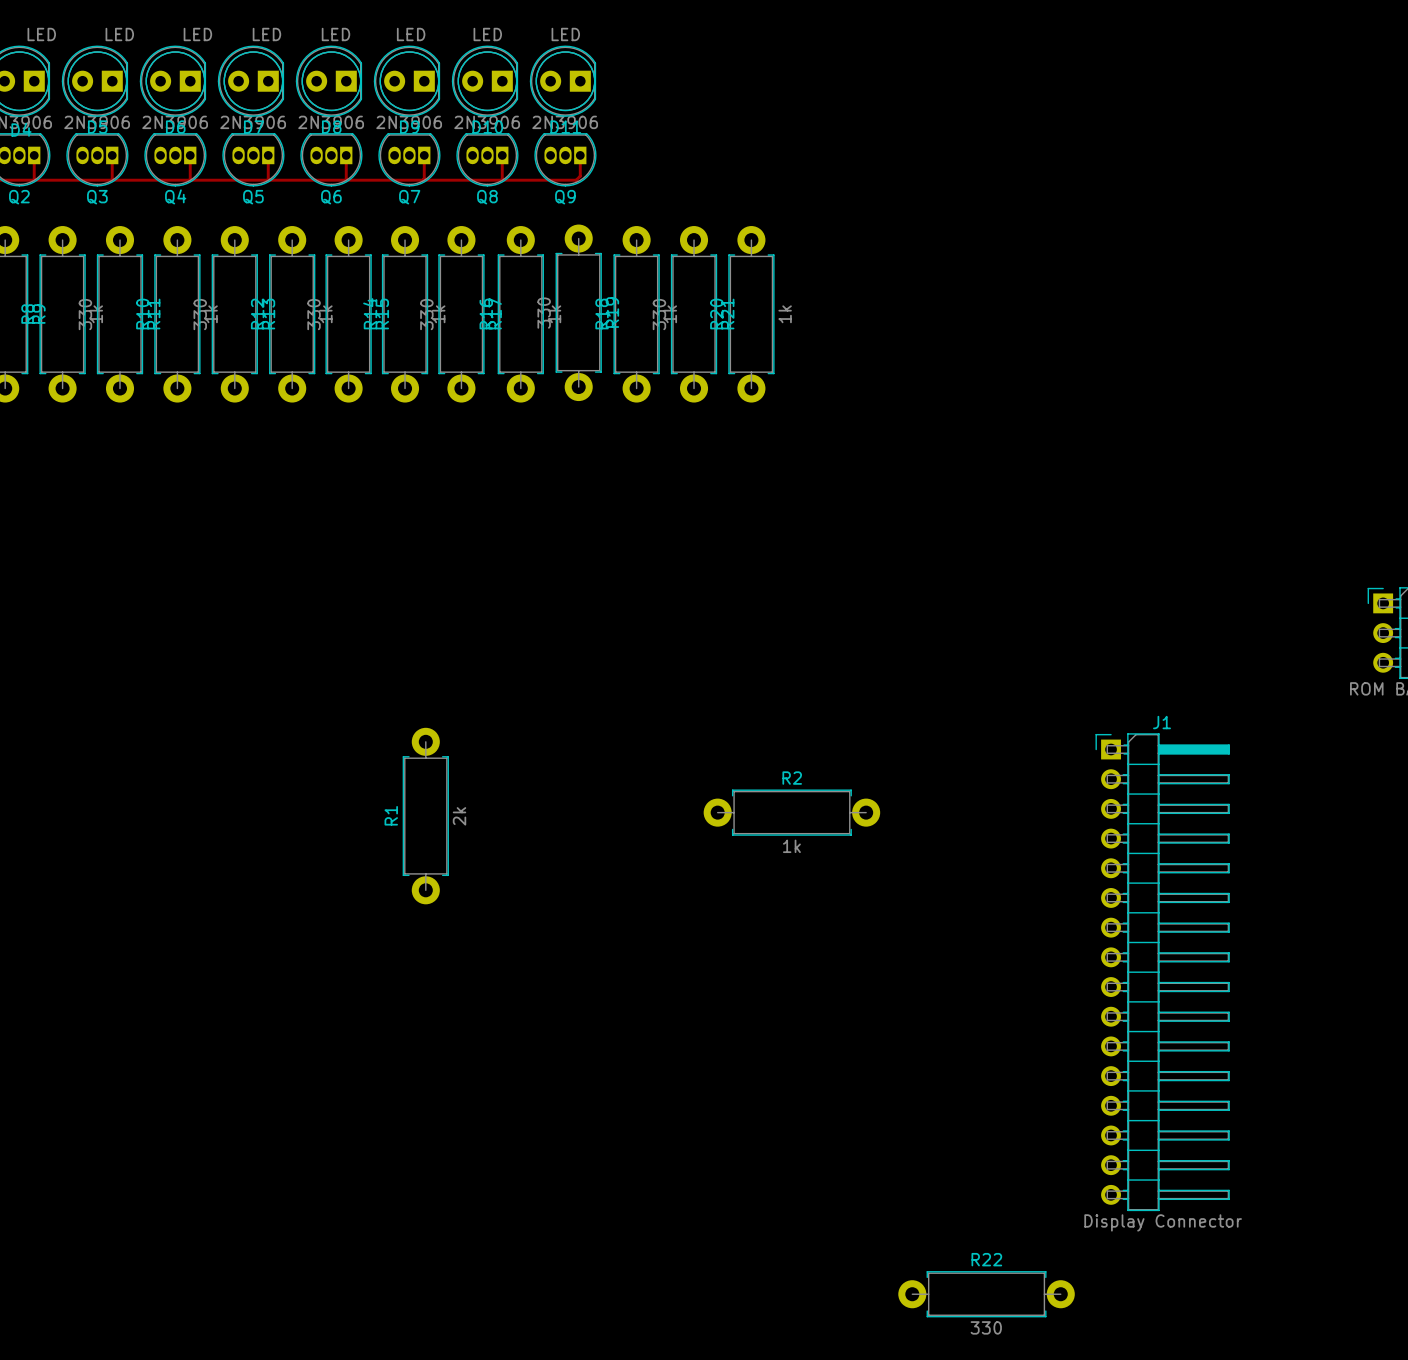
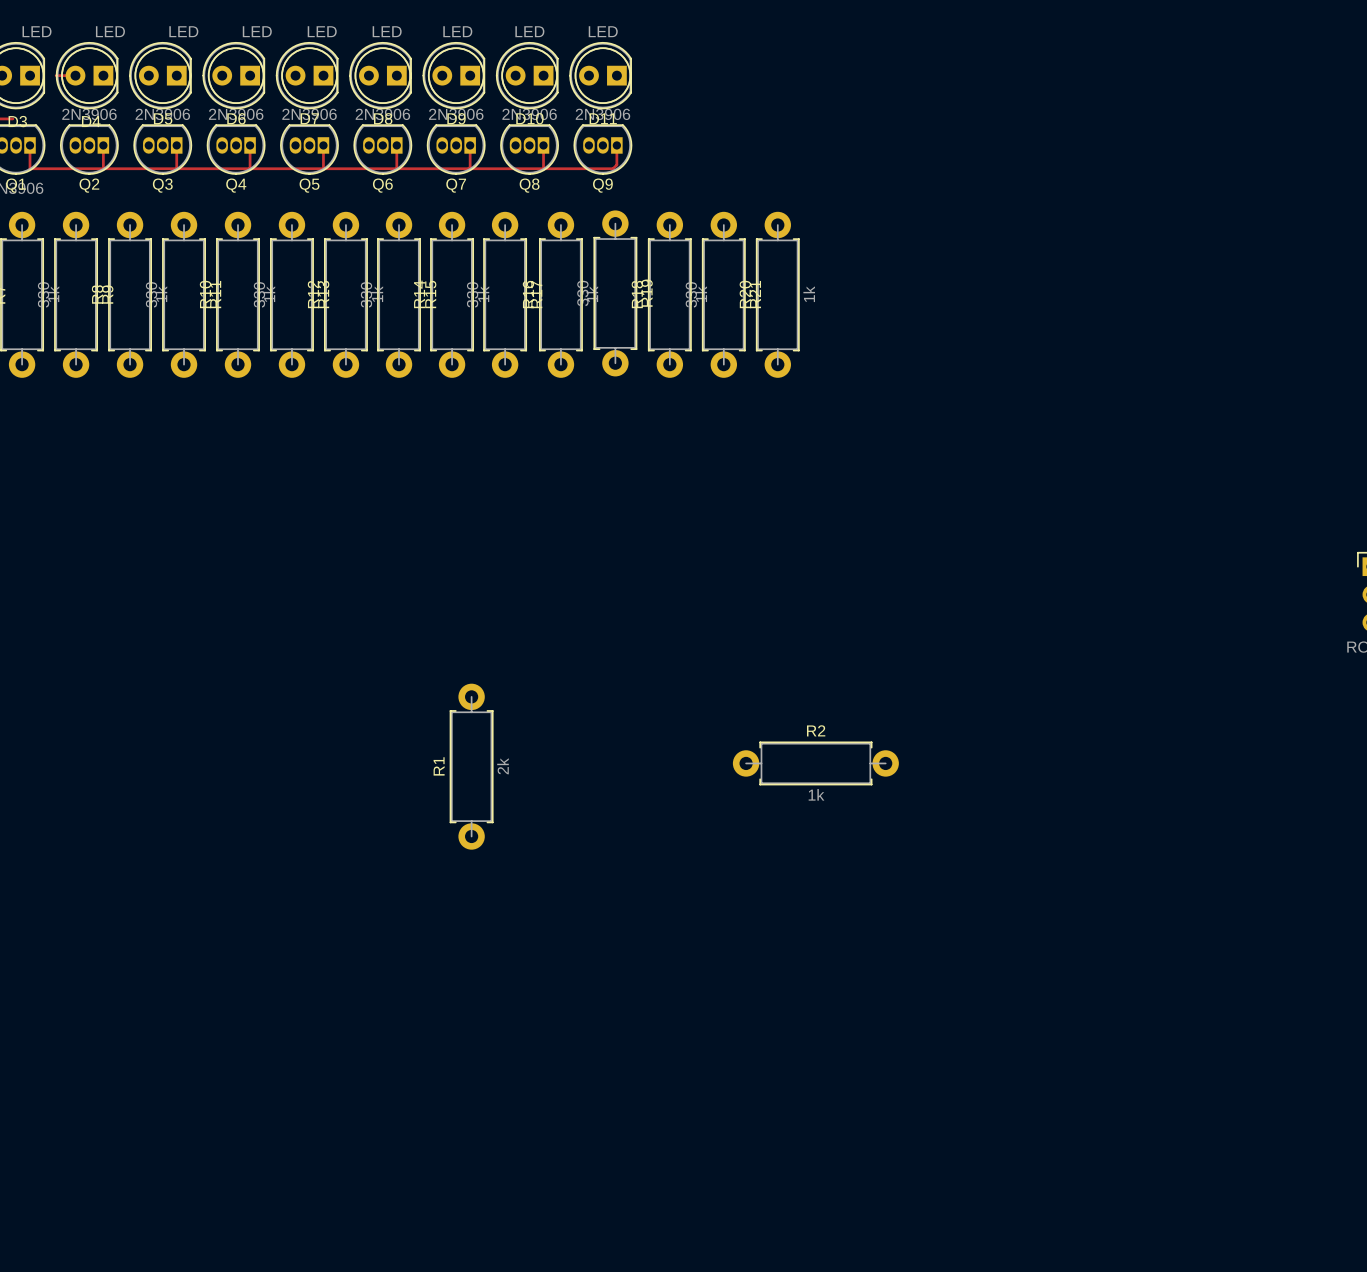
J1: Display Connector (1162, 972) -> none
R22: 330 (986, 1294) -> none

